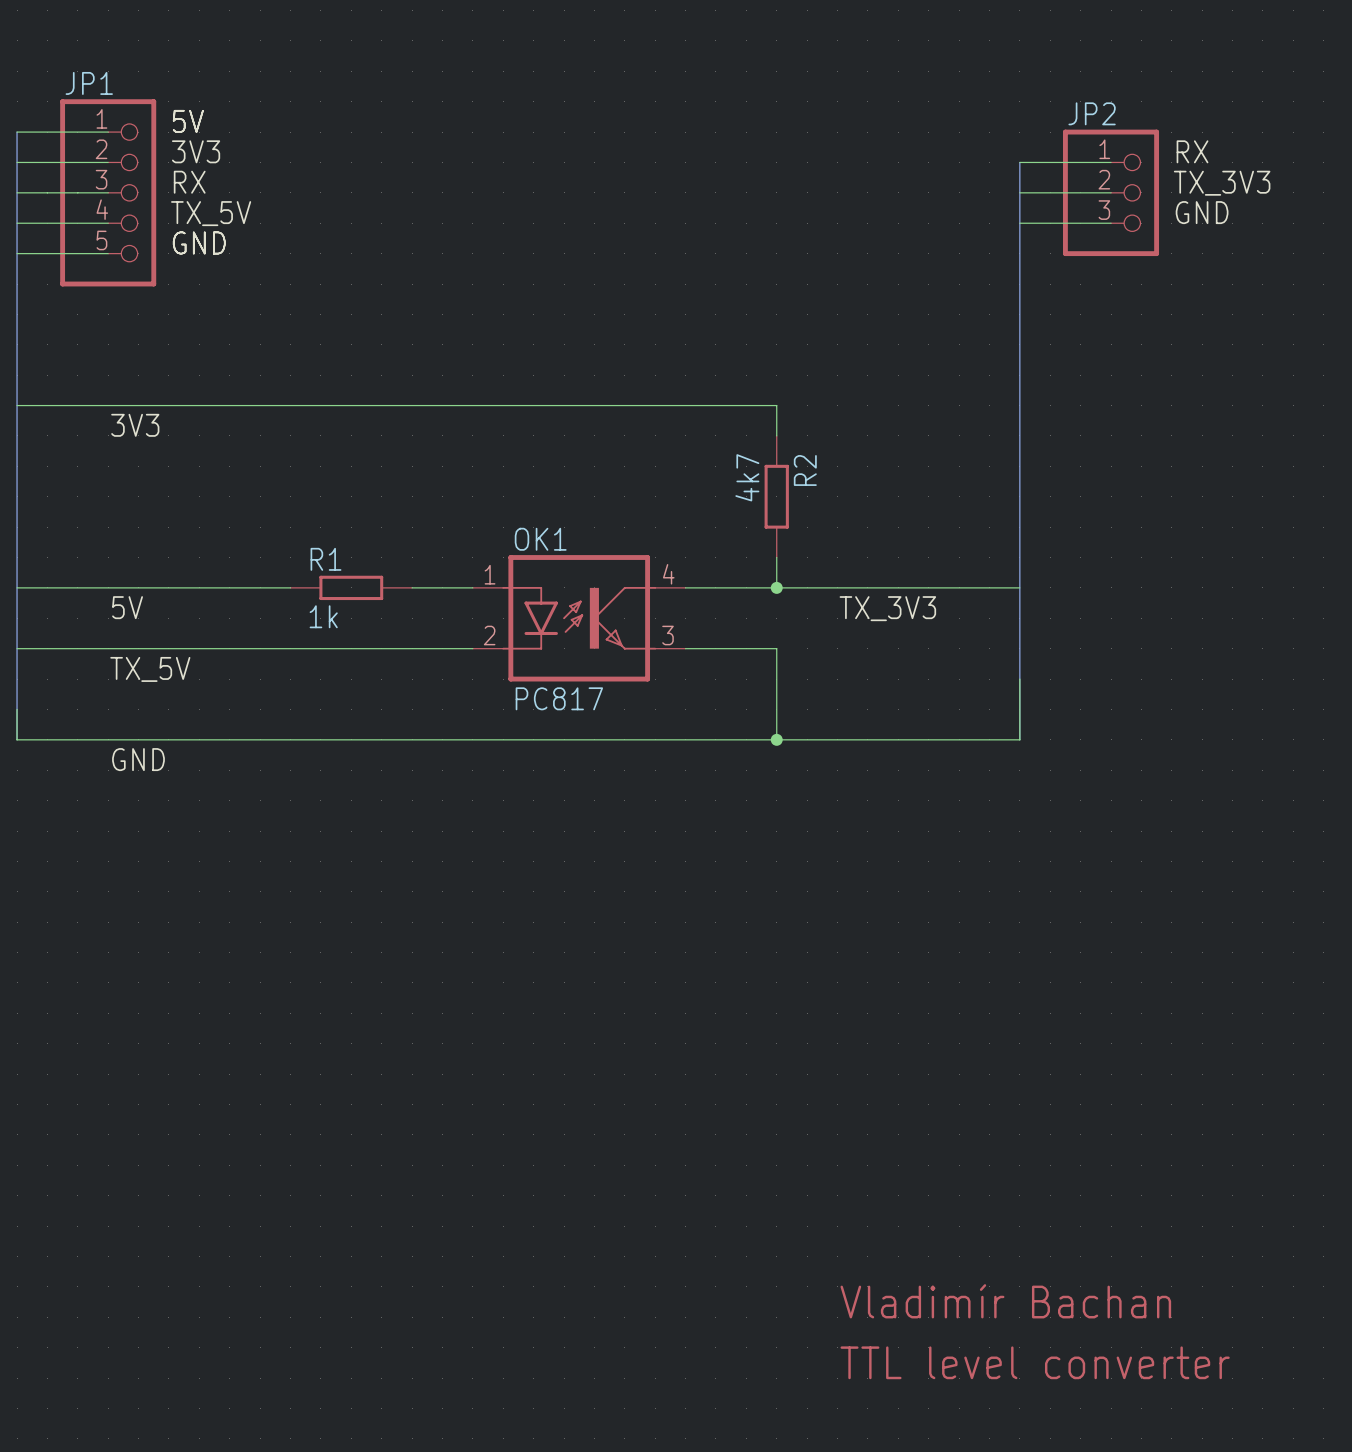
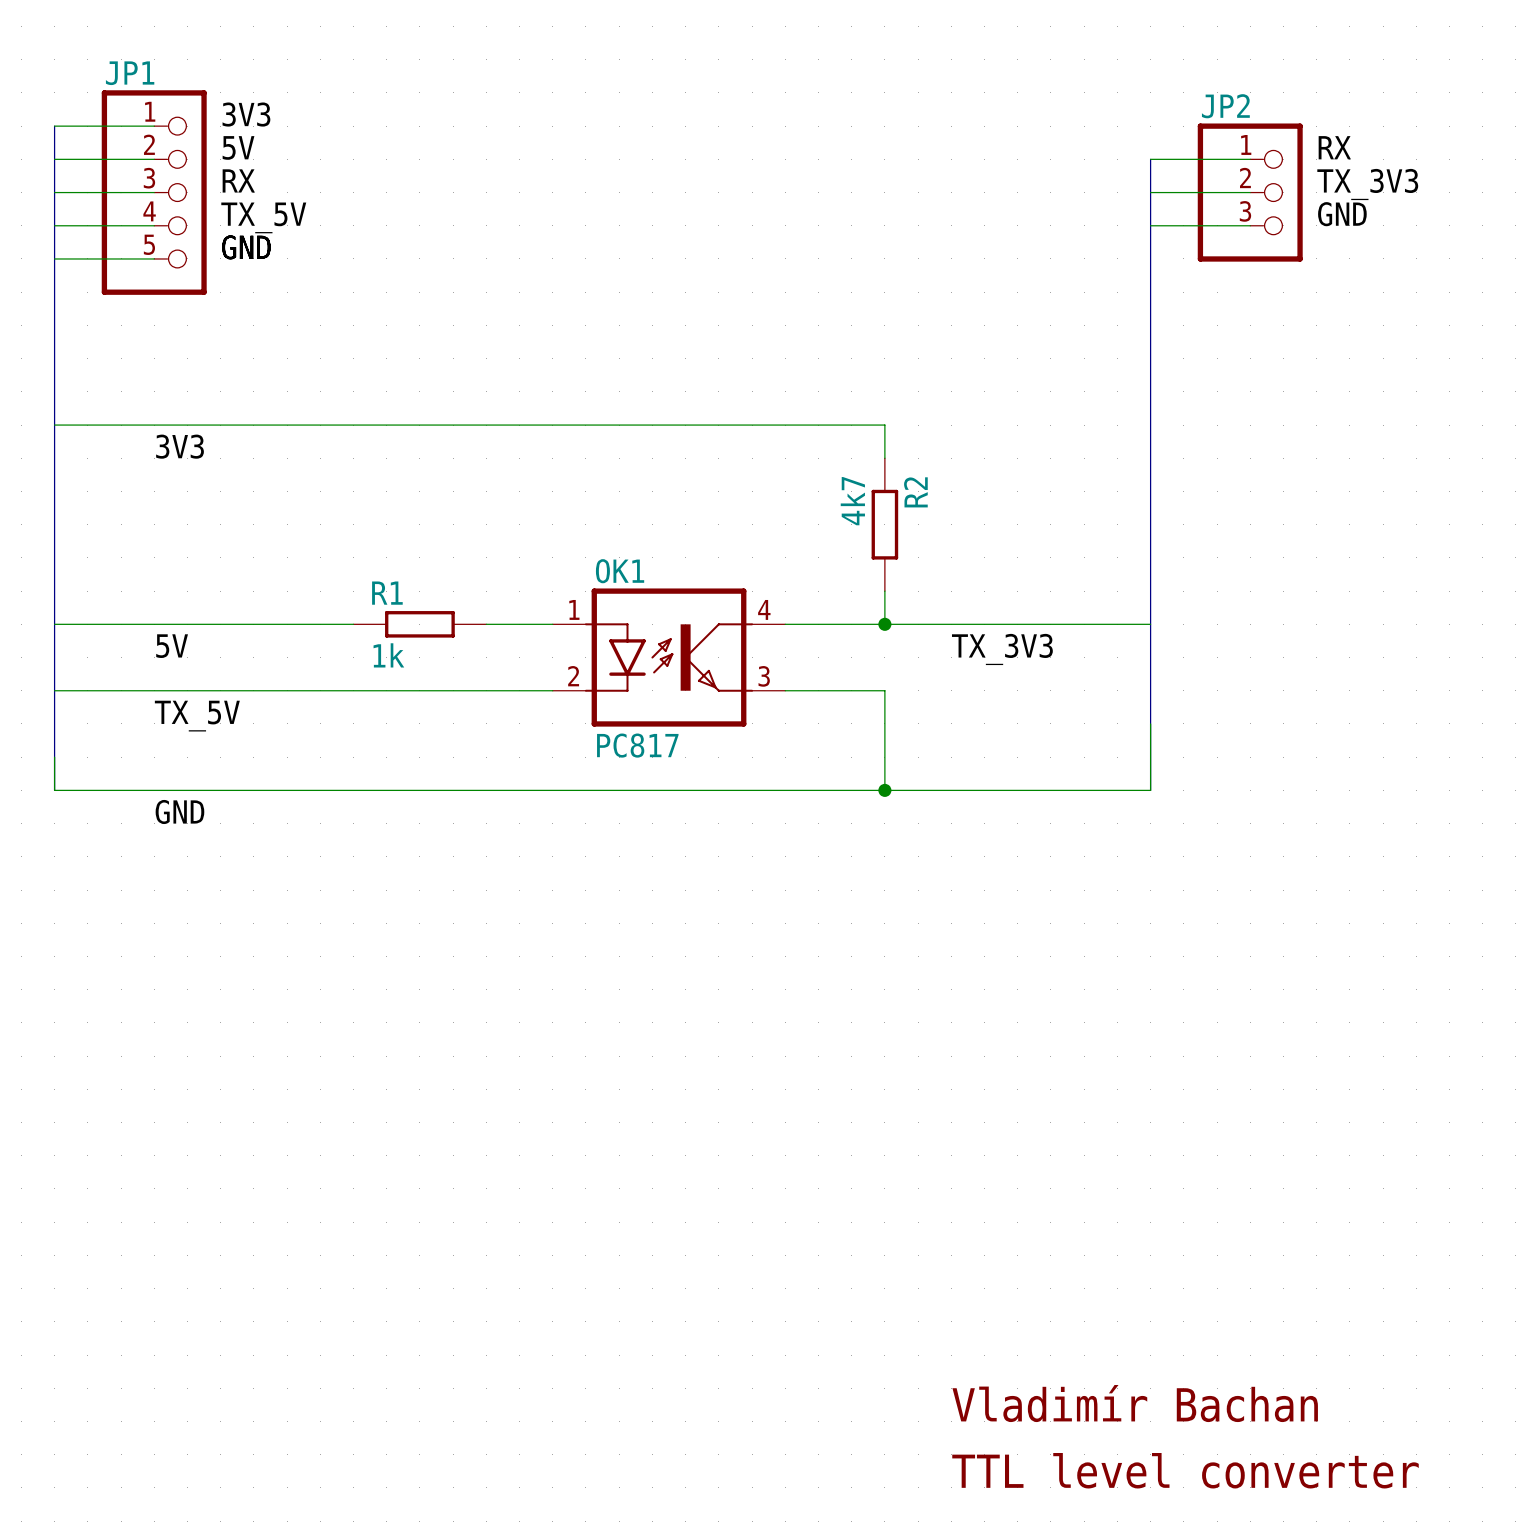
label: 5V (188, 121) -> 3V3 (246, 114)
label: 3V3 (196, 151) -> 5V (238, 147)

